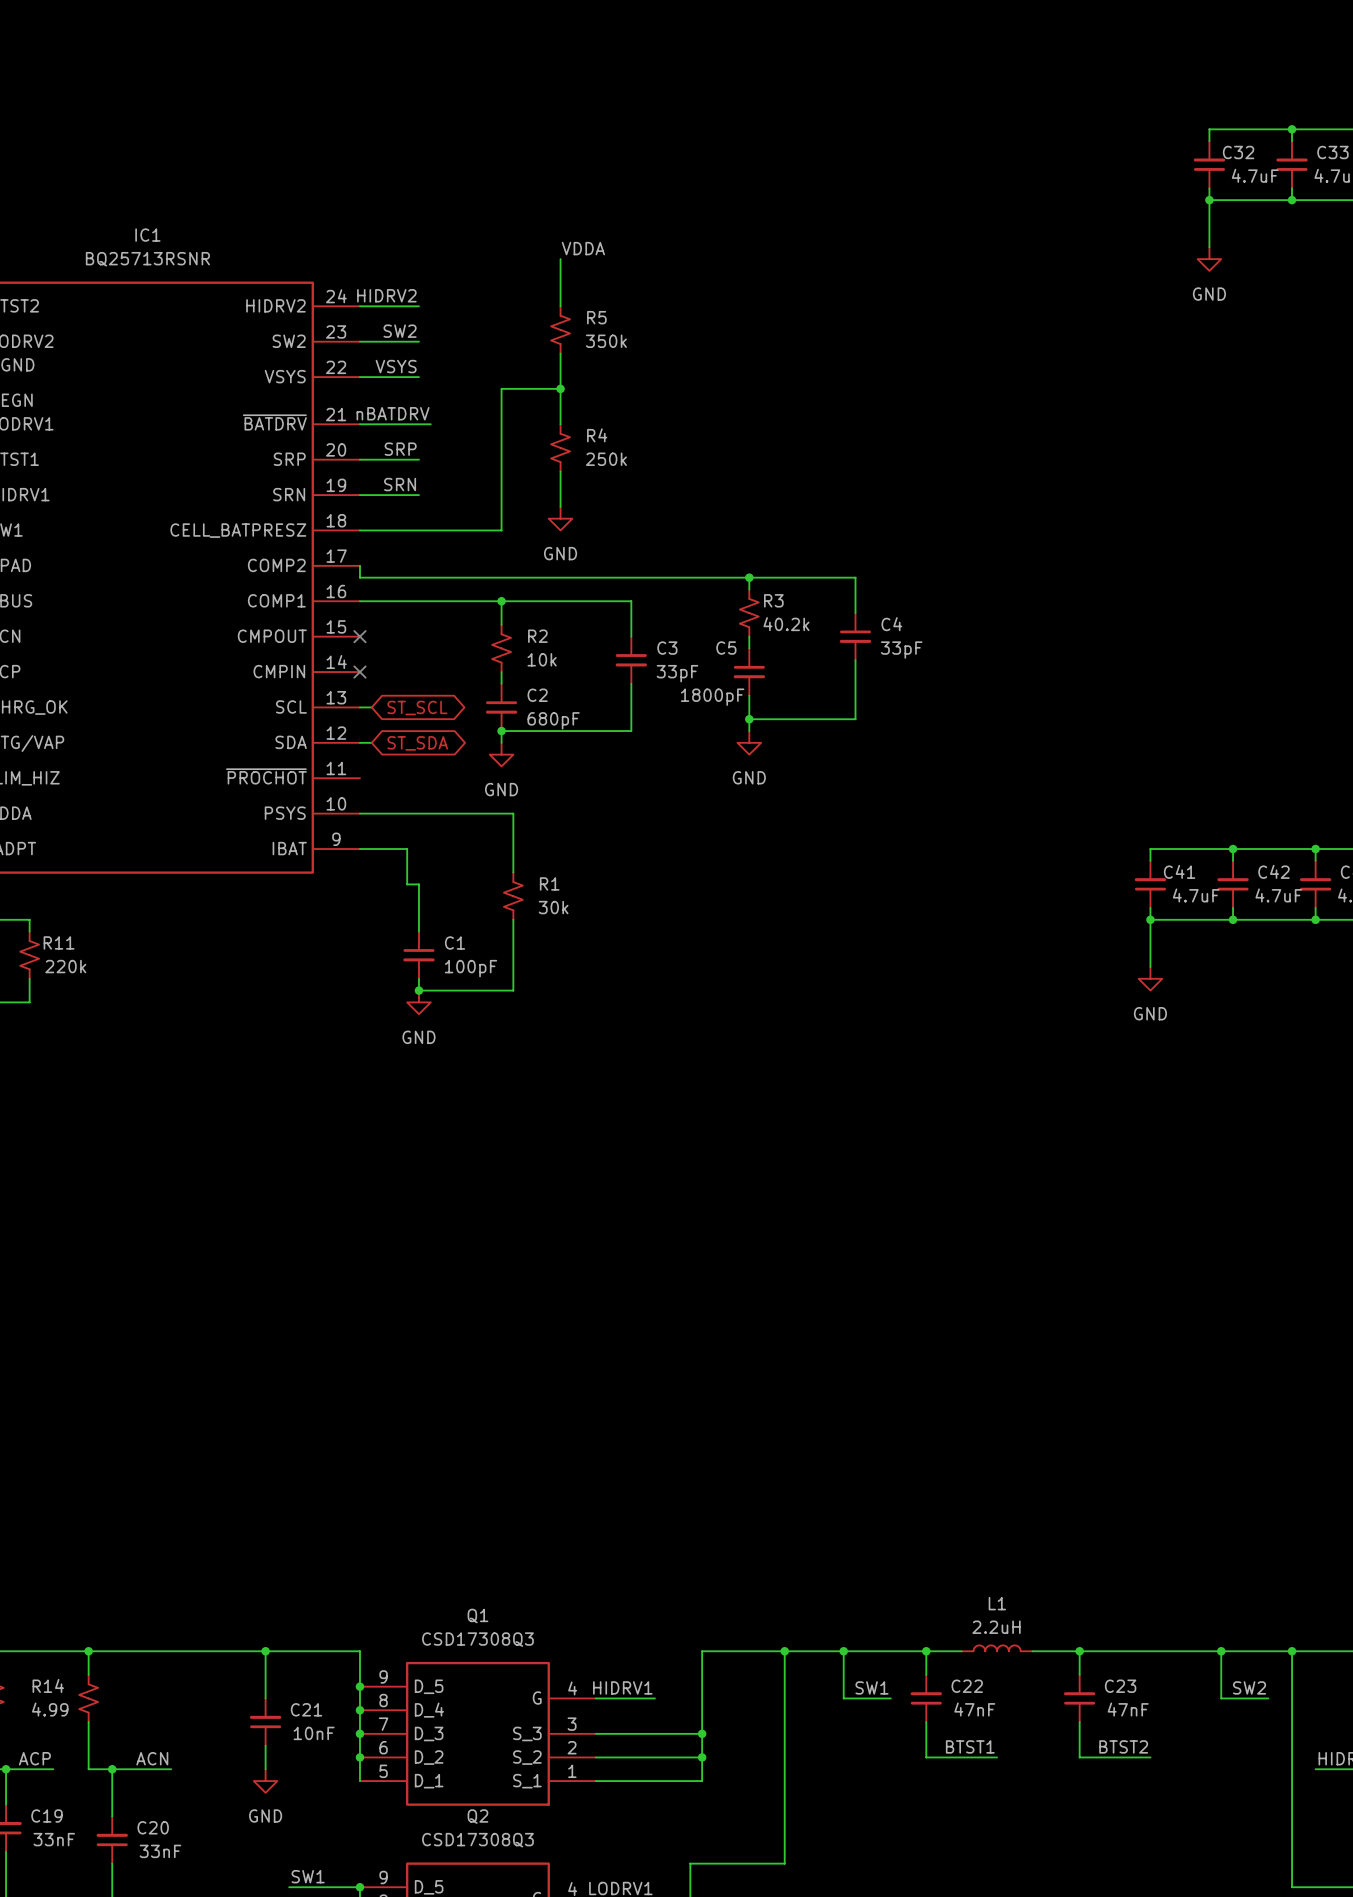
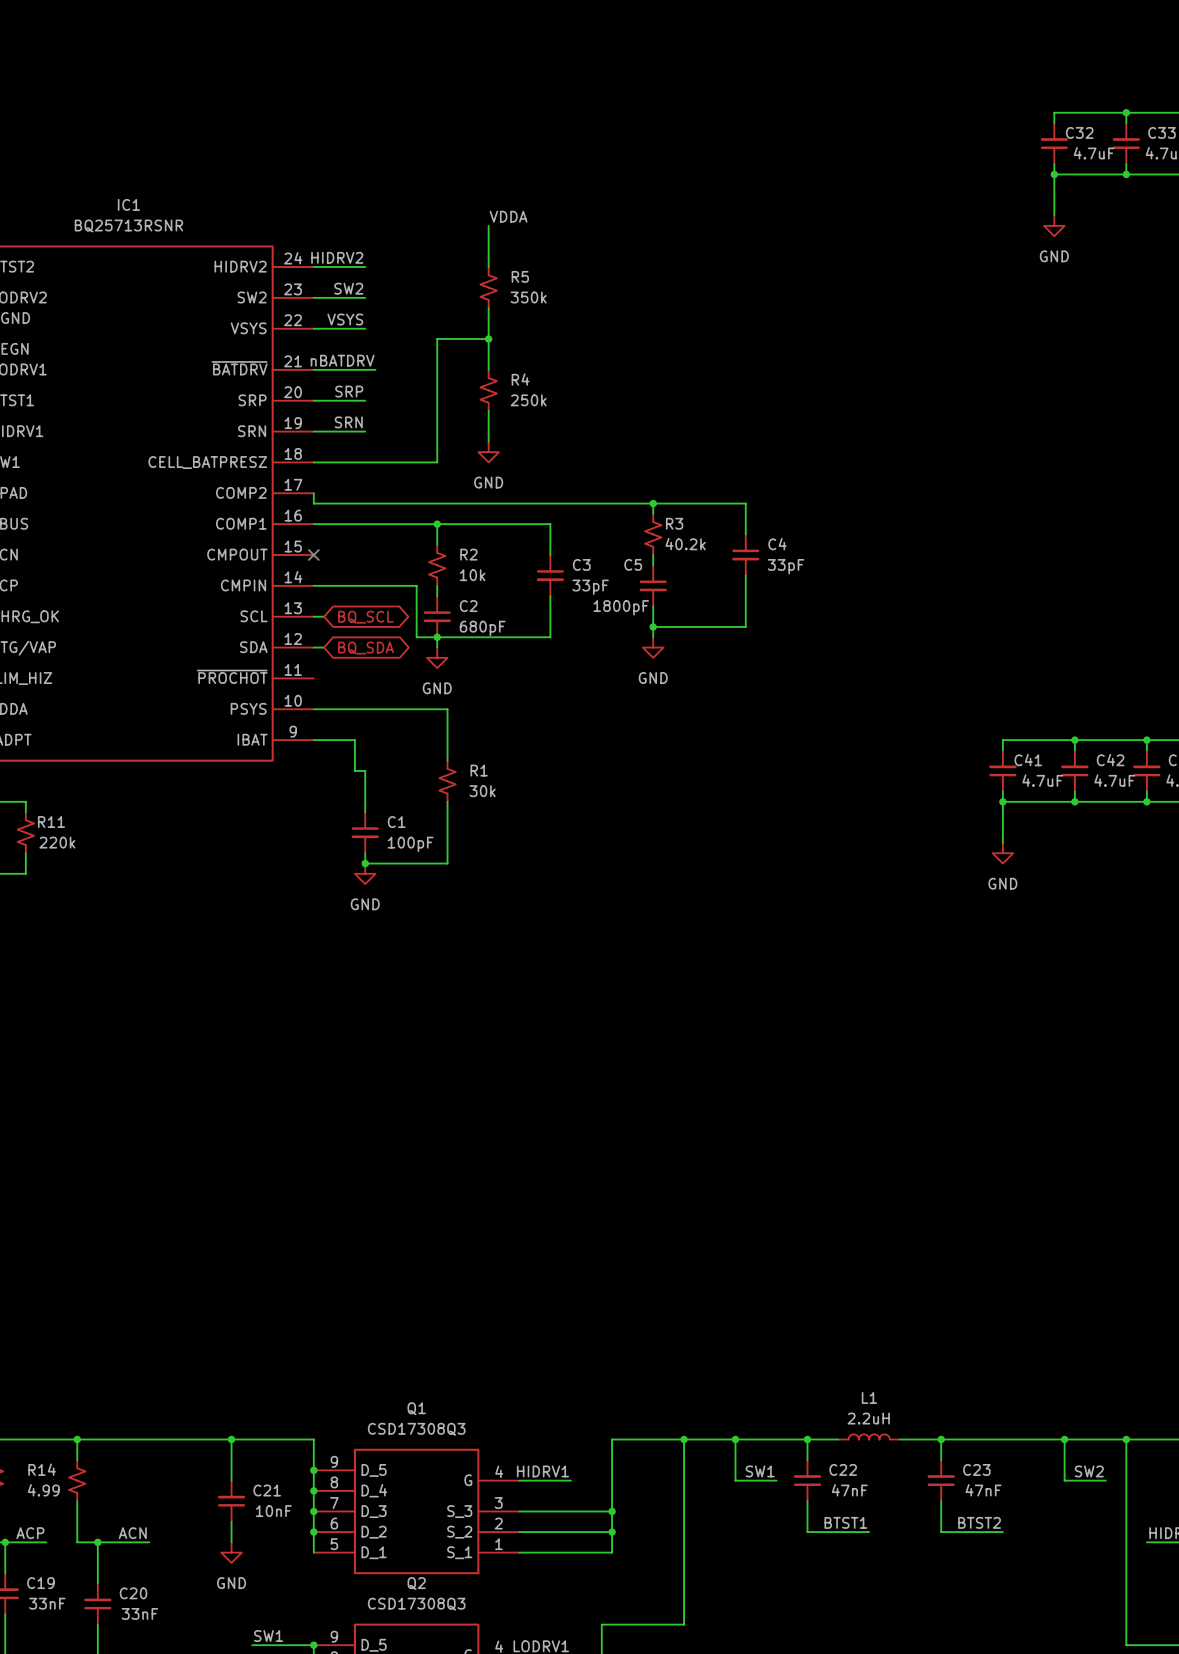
wire: none -> (313, 585) (416, 585) (416, 637) (437, 637)
no-connect mark: (359, 672) -> none
global label: ST_SCL (417, 708) -> BQ_SCL (365, 617)
global label: ST_SDA (417, 743) -> BQ_SDA (366, 648)

